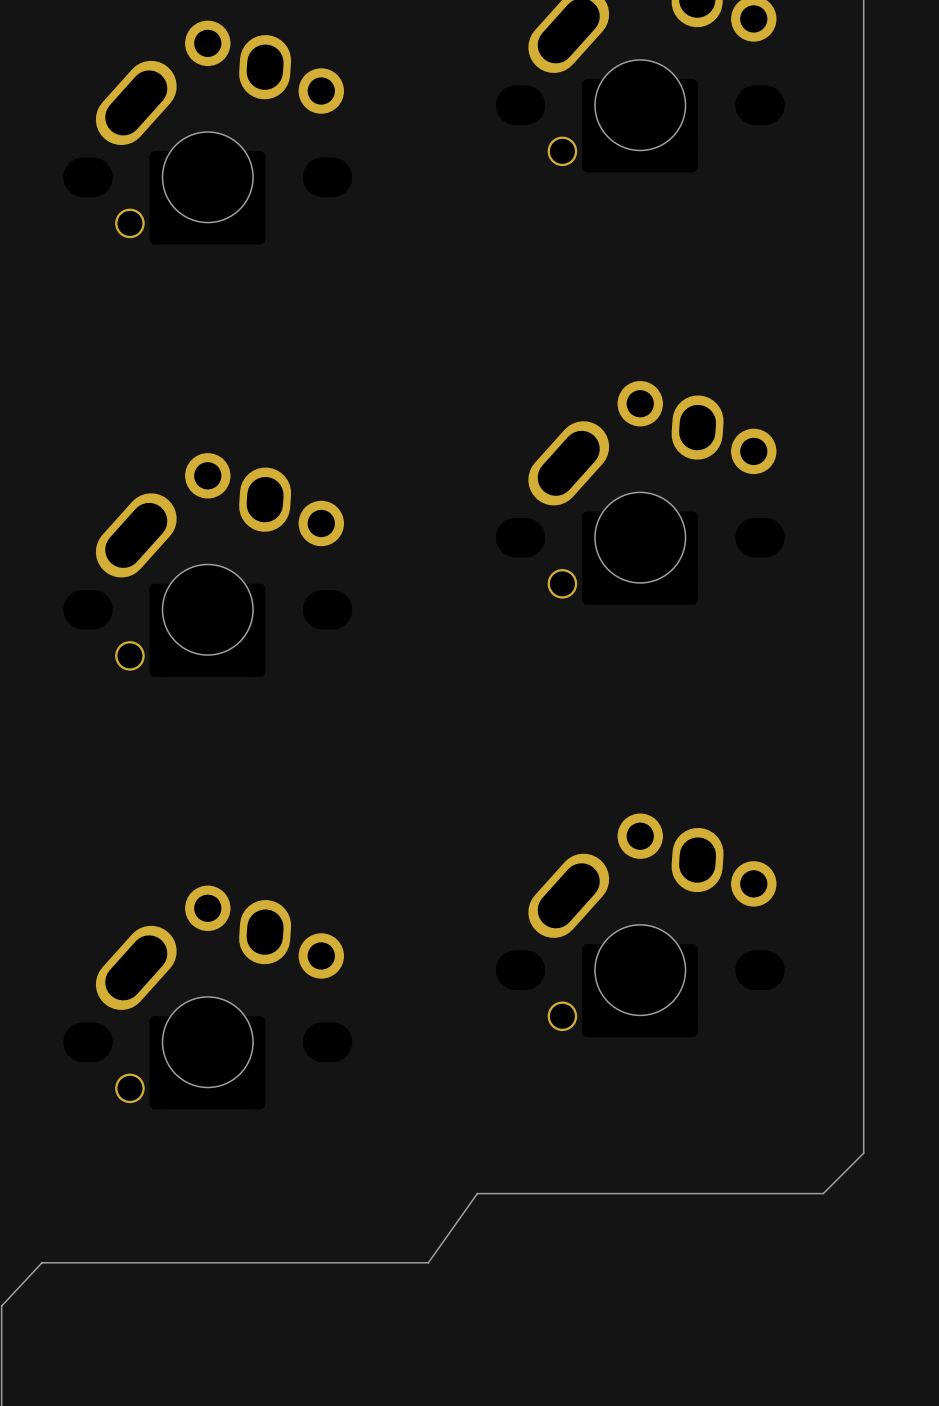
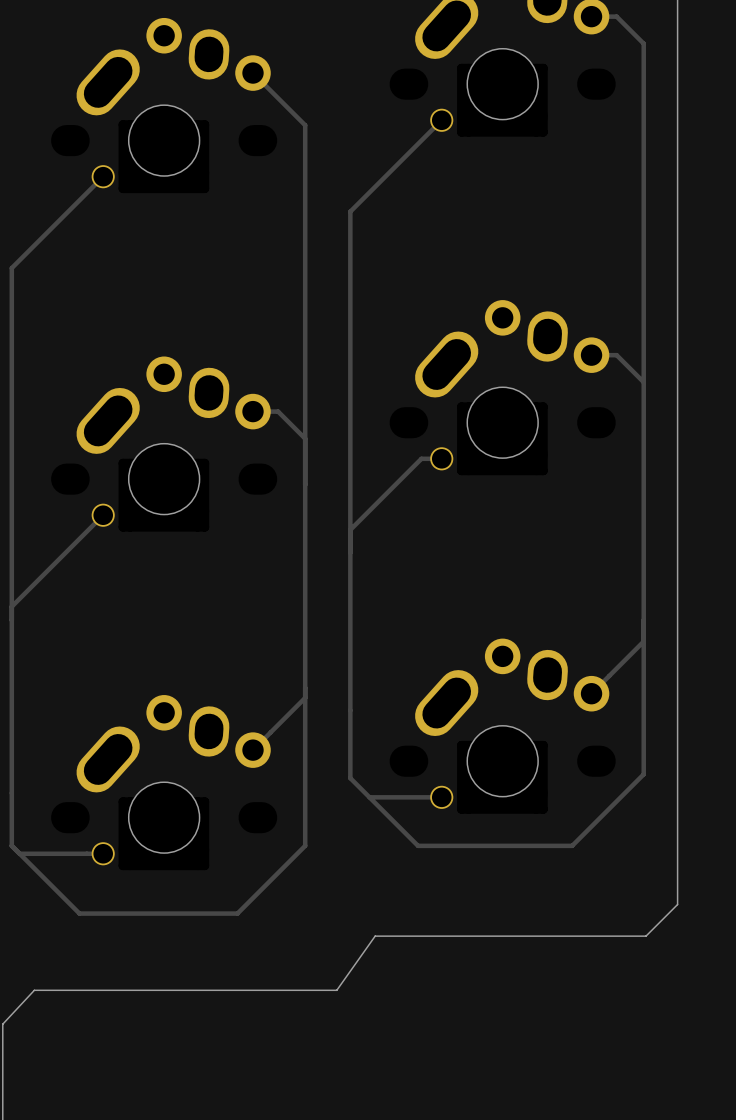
track: none -> (591, 16) (616, 16) (643, 43) (643, 774) (572, 845) (418, 845) (350, 778) (350, 211) (441, 120)
track: none -> (253, 73) (305, 125) (305, 845) (237, 913) (79, 913) (11, 845) (11, 268) (103, 176)
track: none -> (591, 355) (616, 355) (643, 382)
track: none -> (253, 411) (278, 411) (305, 438)
track: none -> (441, 458) (421, 458) (350, 529)
track: none -> (103, 515) (11, 606)
track: none -> (643, 641) (591, 693)
track: none -> (305, 697) (253, 750)
track: none -> (369, 797) (441, 797)
track: none -> (19, 853) (103, 853)

